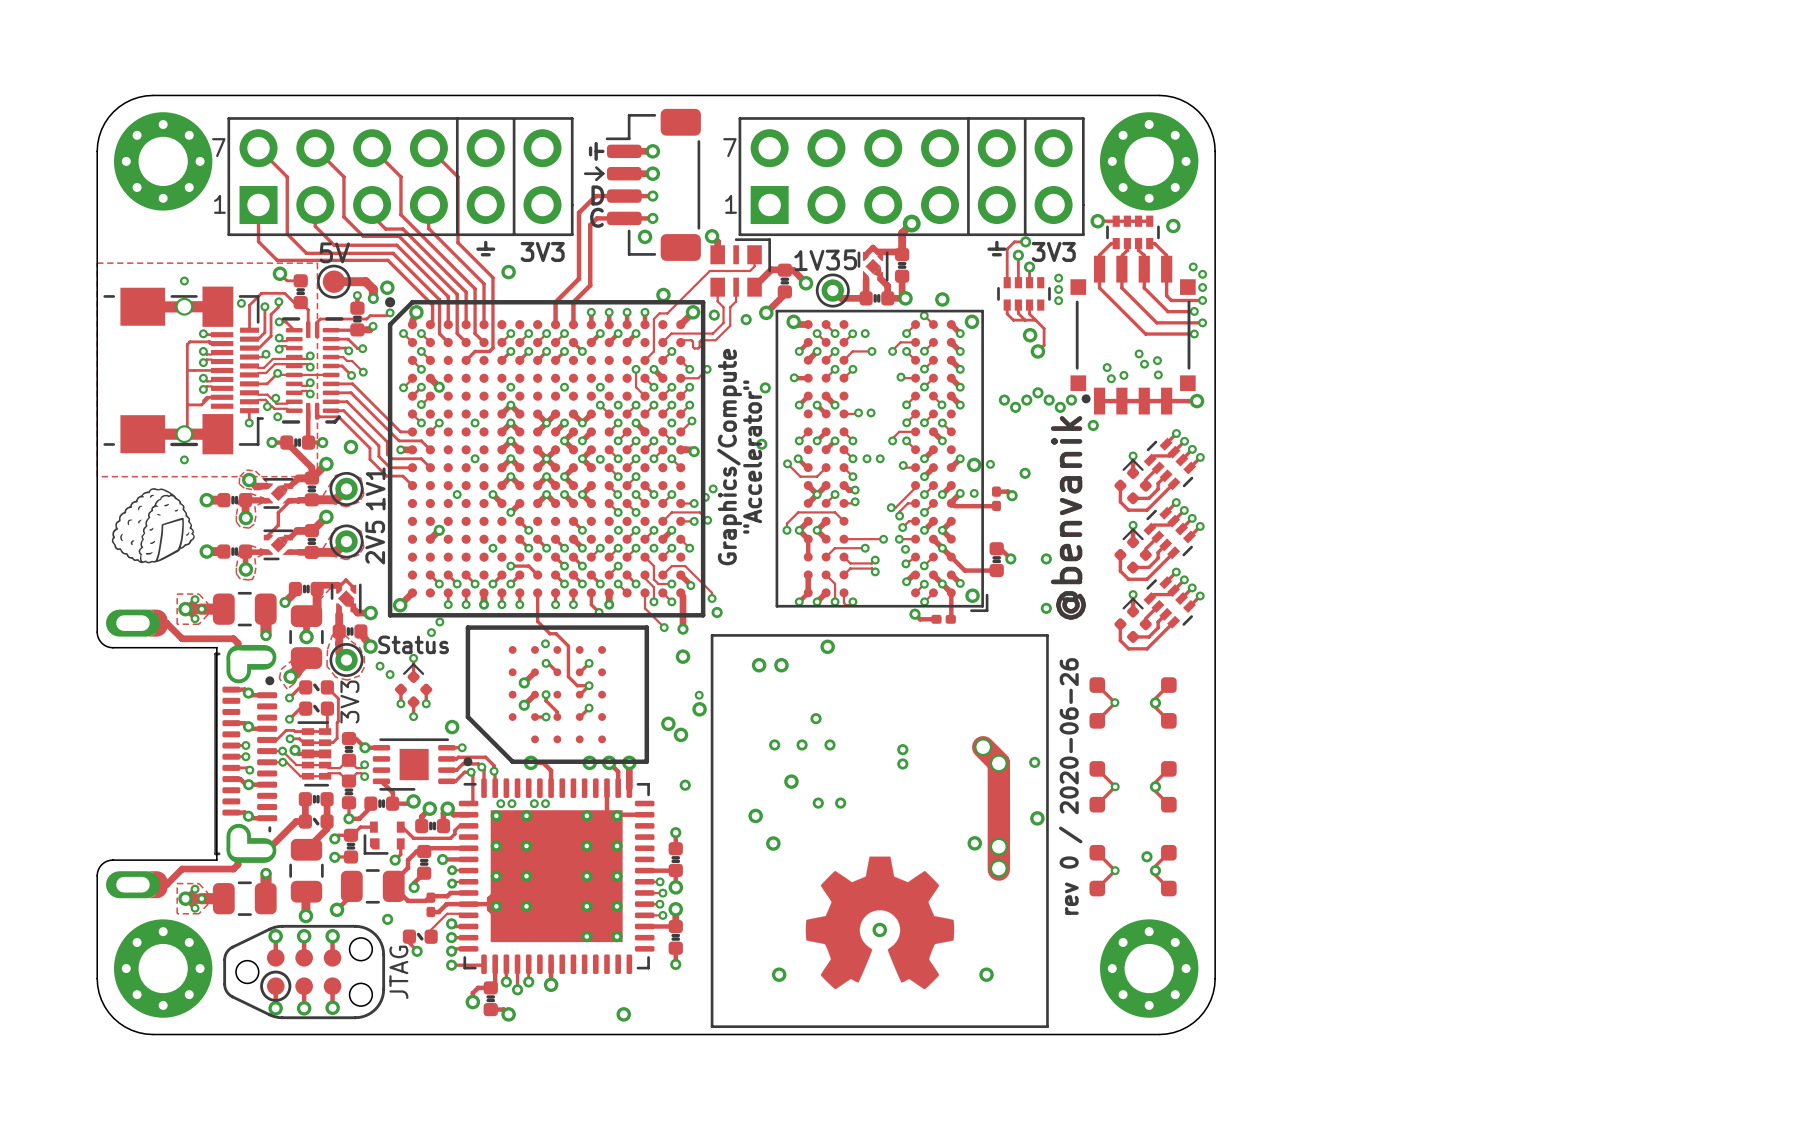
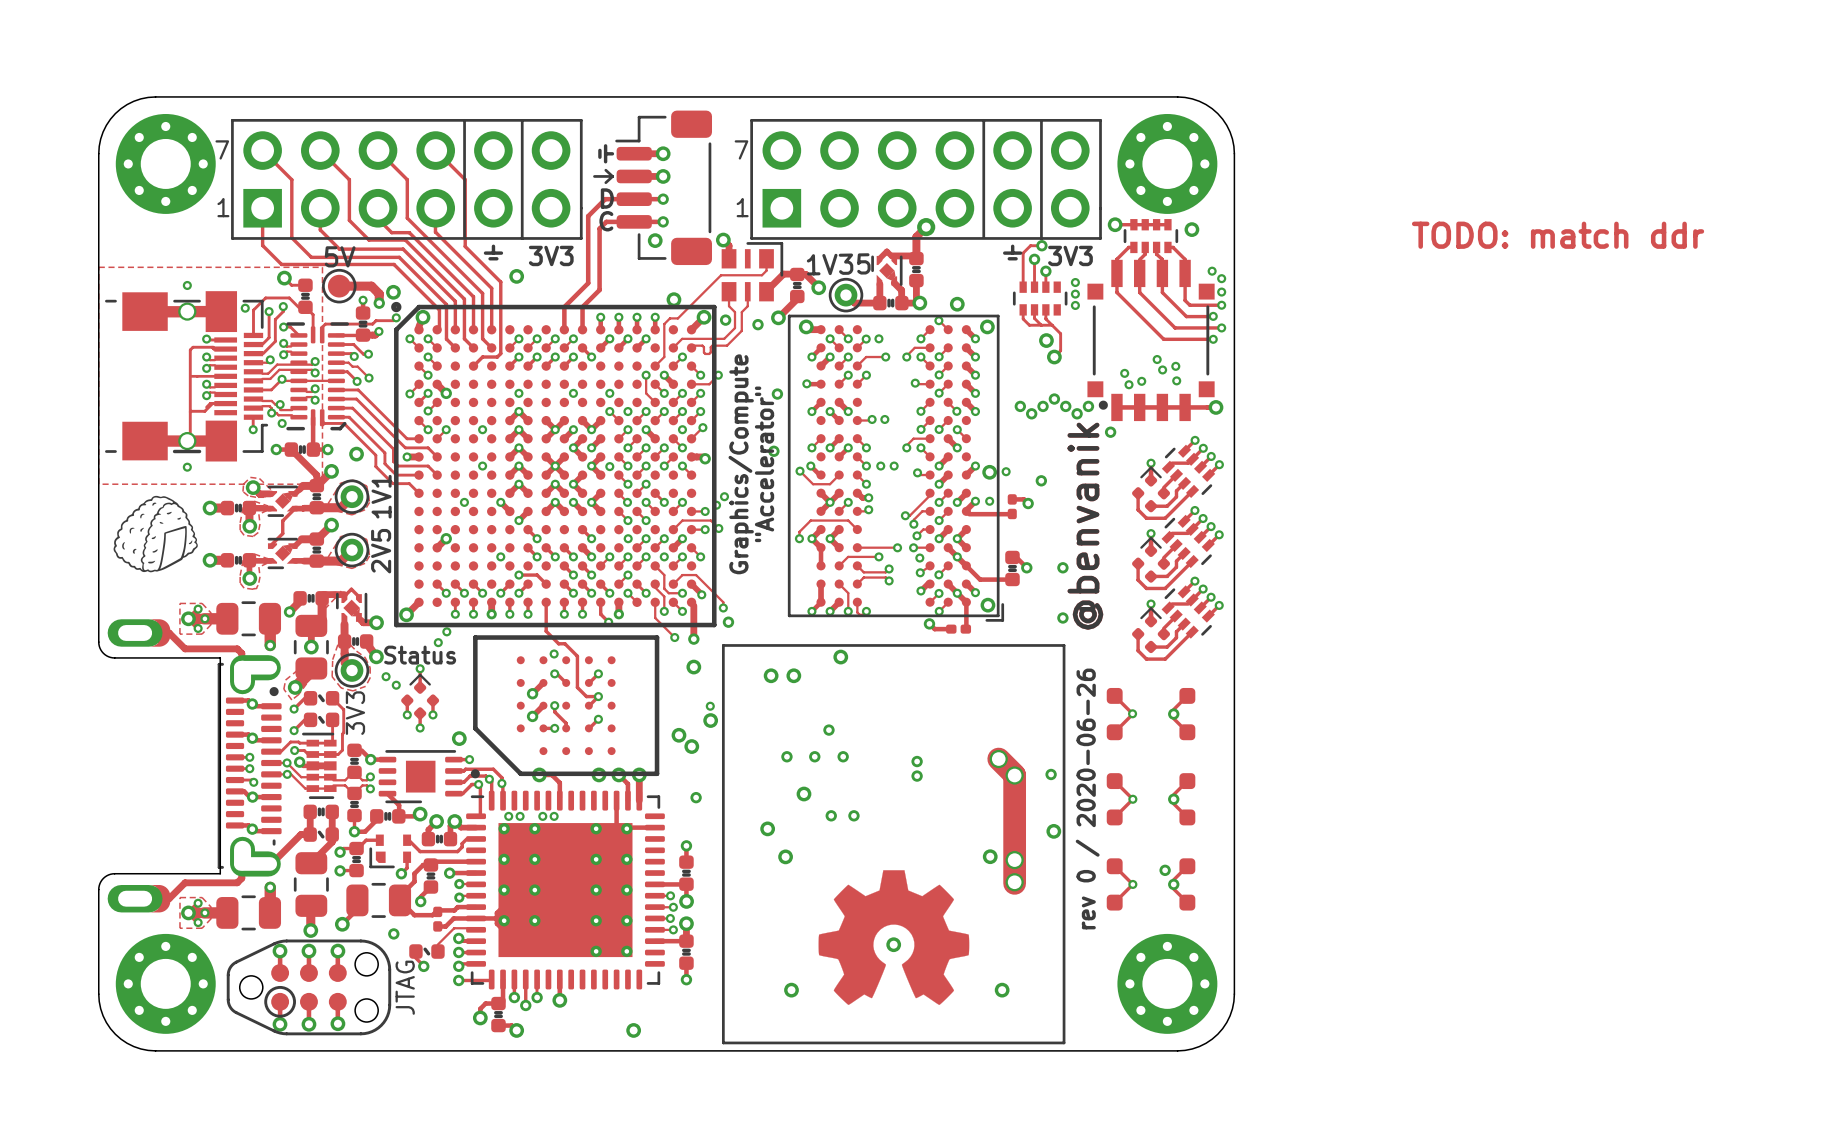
text: none -> TODO: match ddr (1558, 235)

